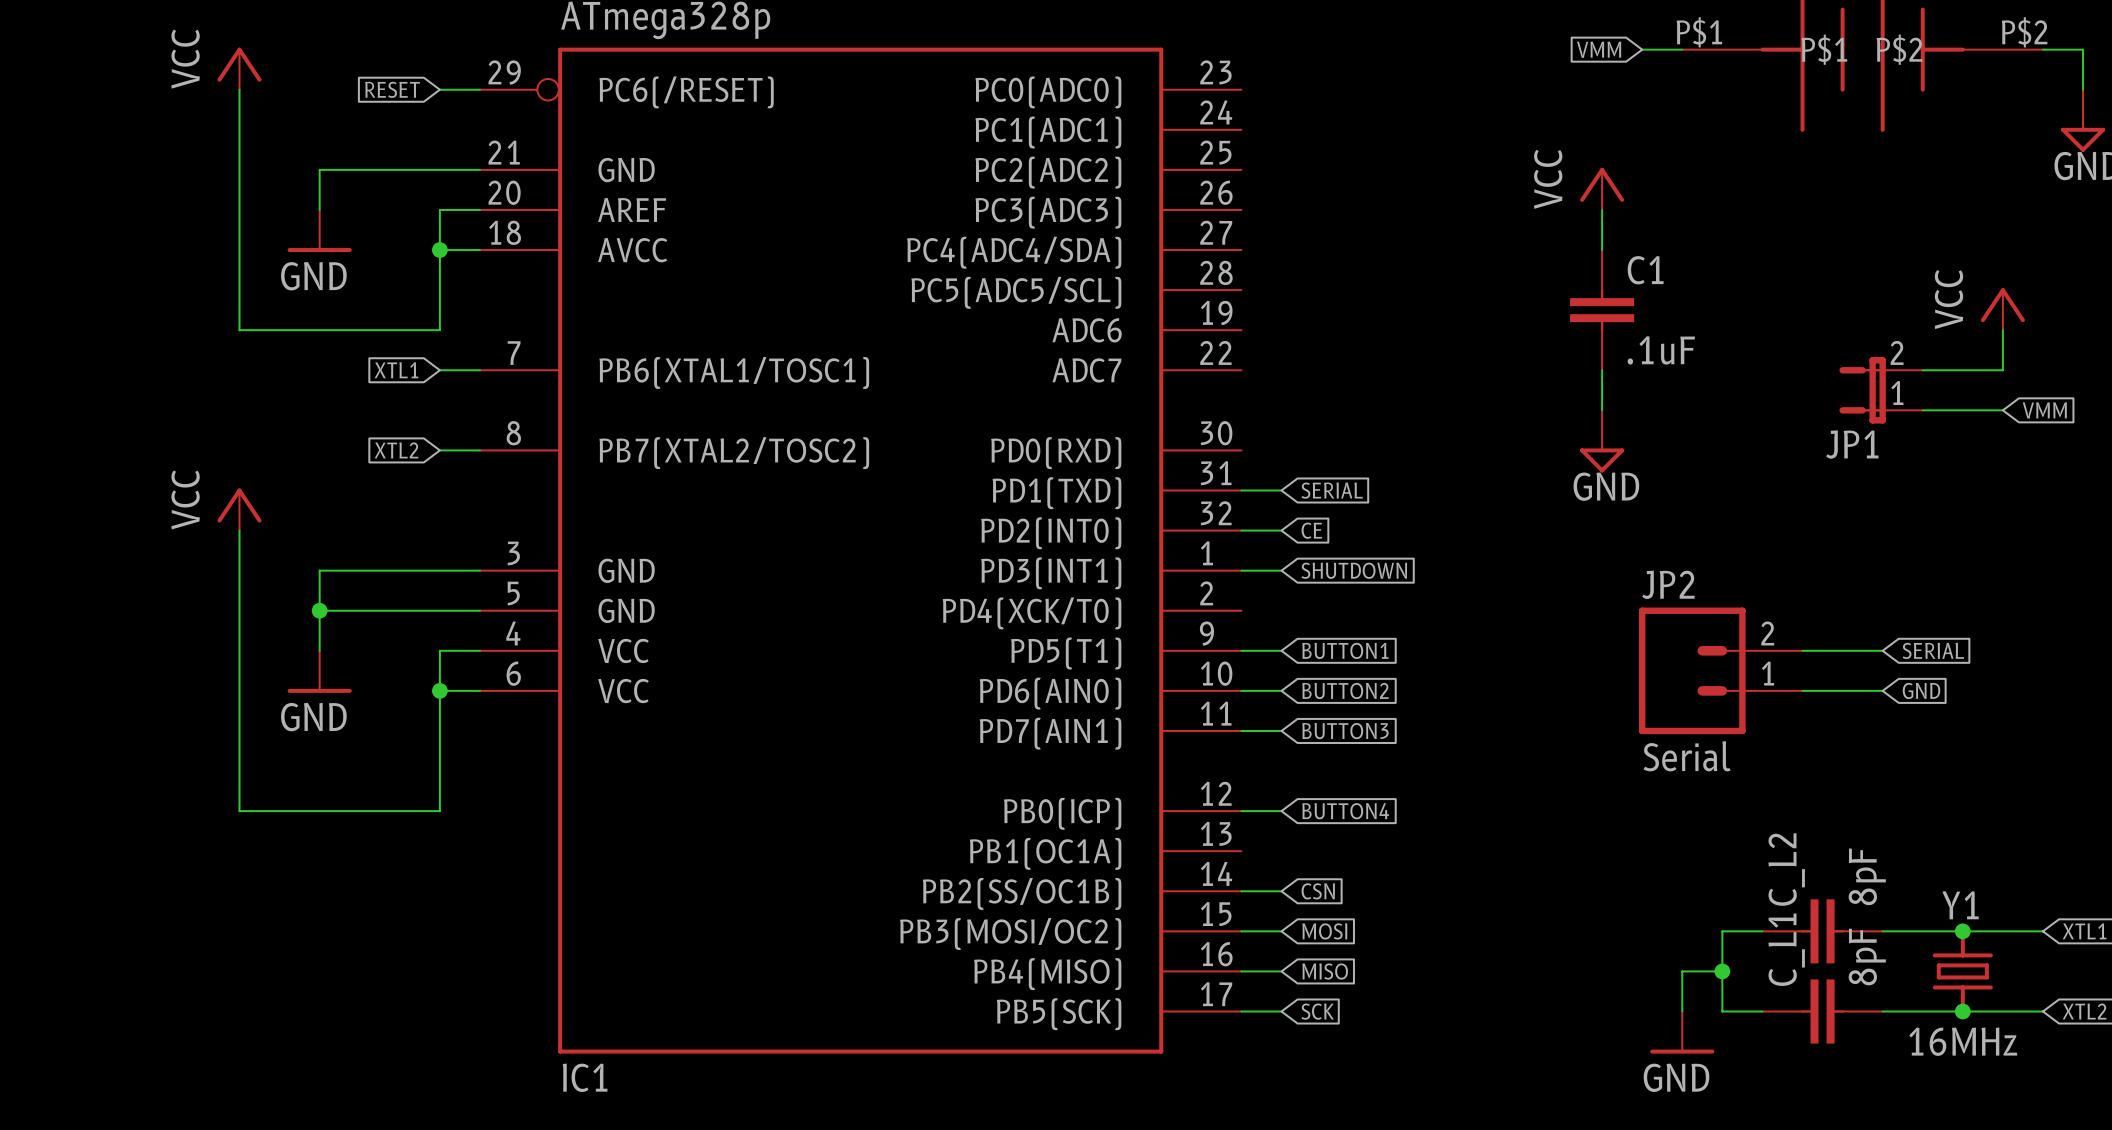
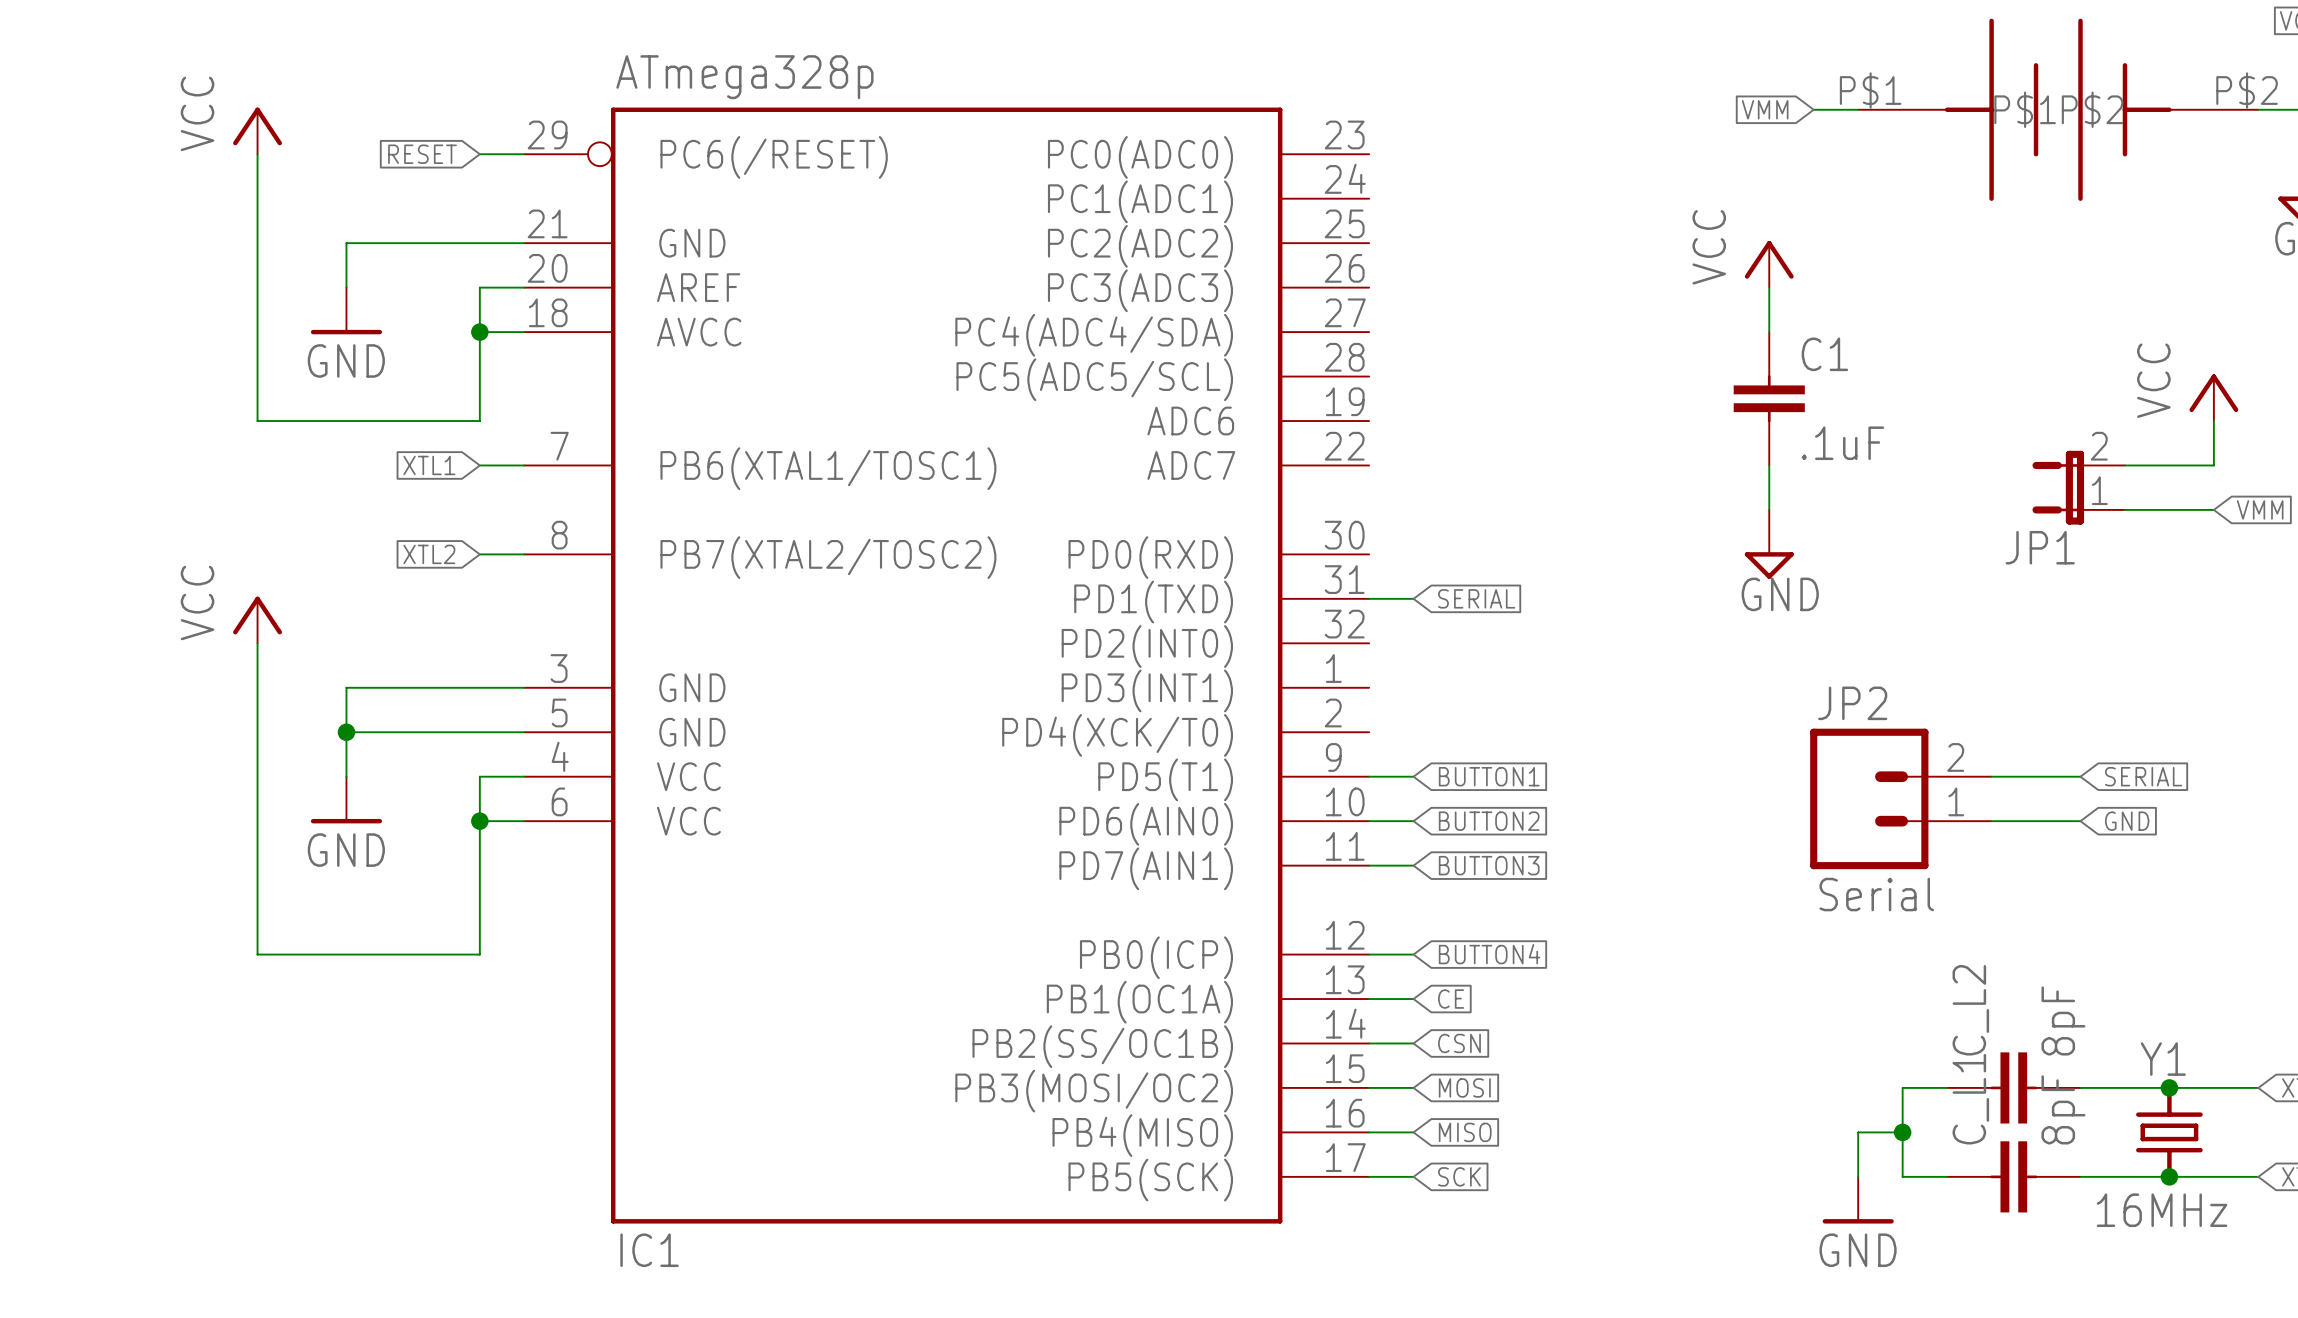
wire: (1241, 530) (1281, 530) -> none
global label position: CE (1311, 530) -> CE (1451, 999)
wire: (1241, 570) (1281, 570) -> (1369, 999) (1413, 999)
global label: SHUTDOWN (1354, 570) -> none

